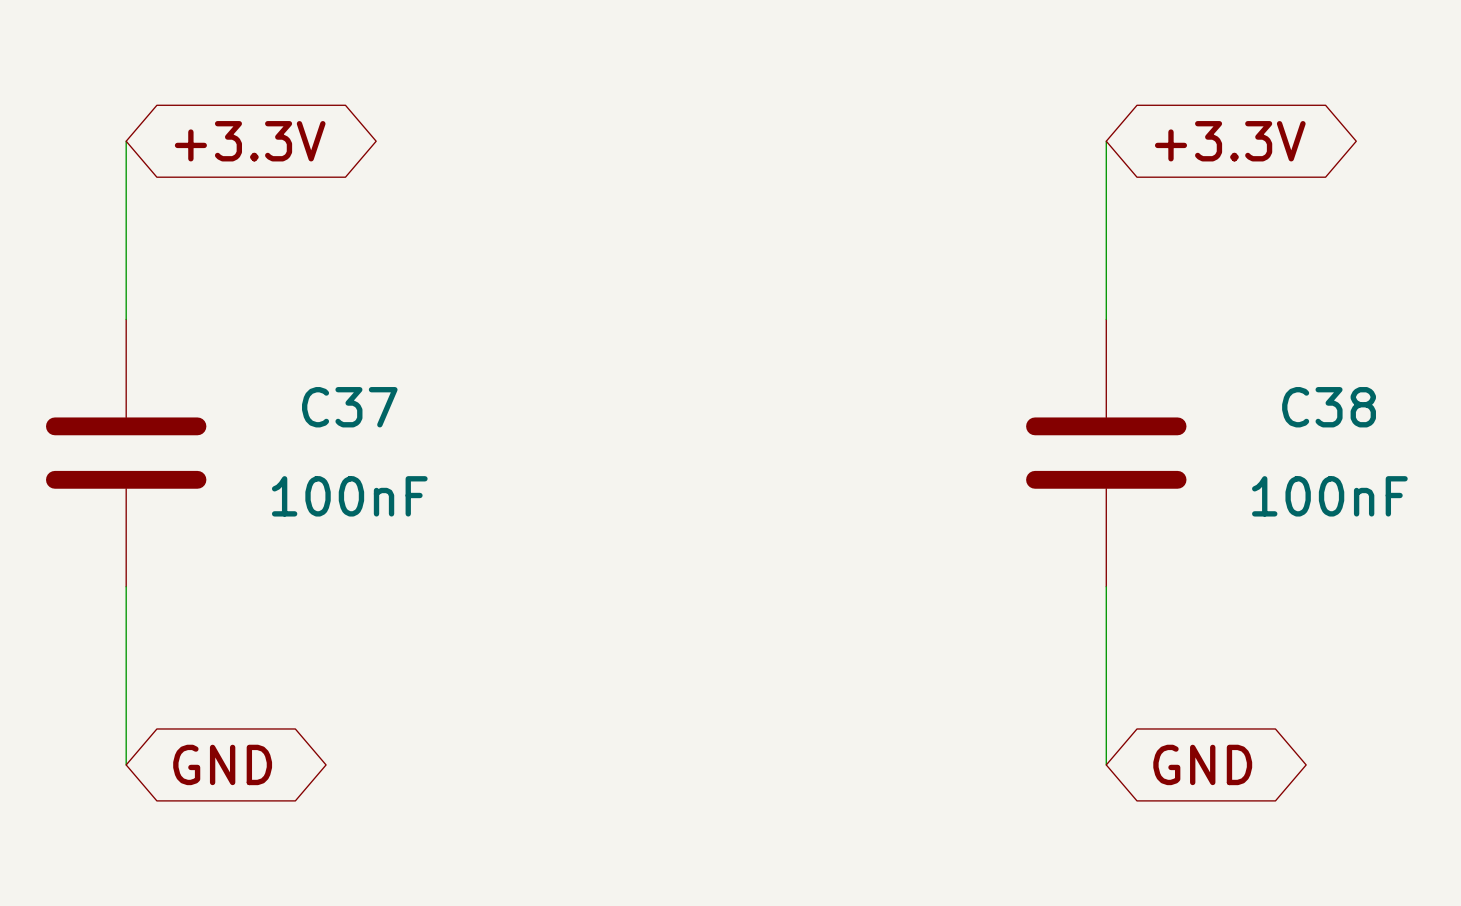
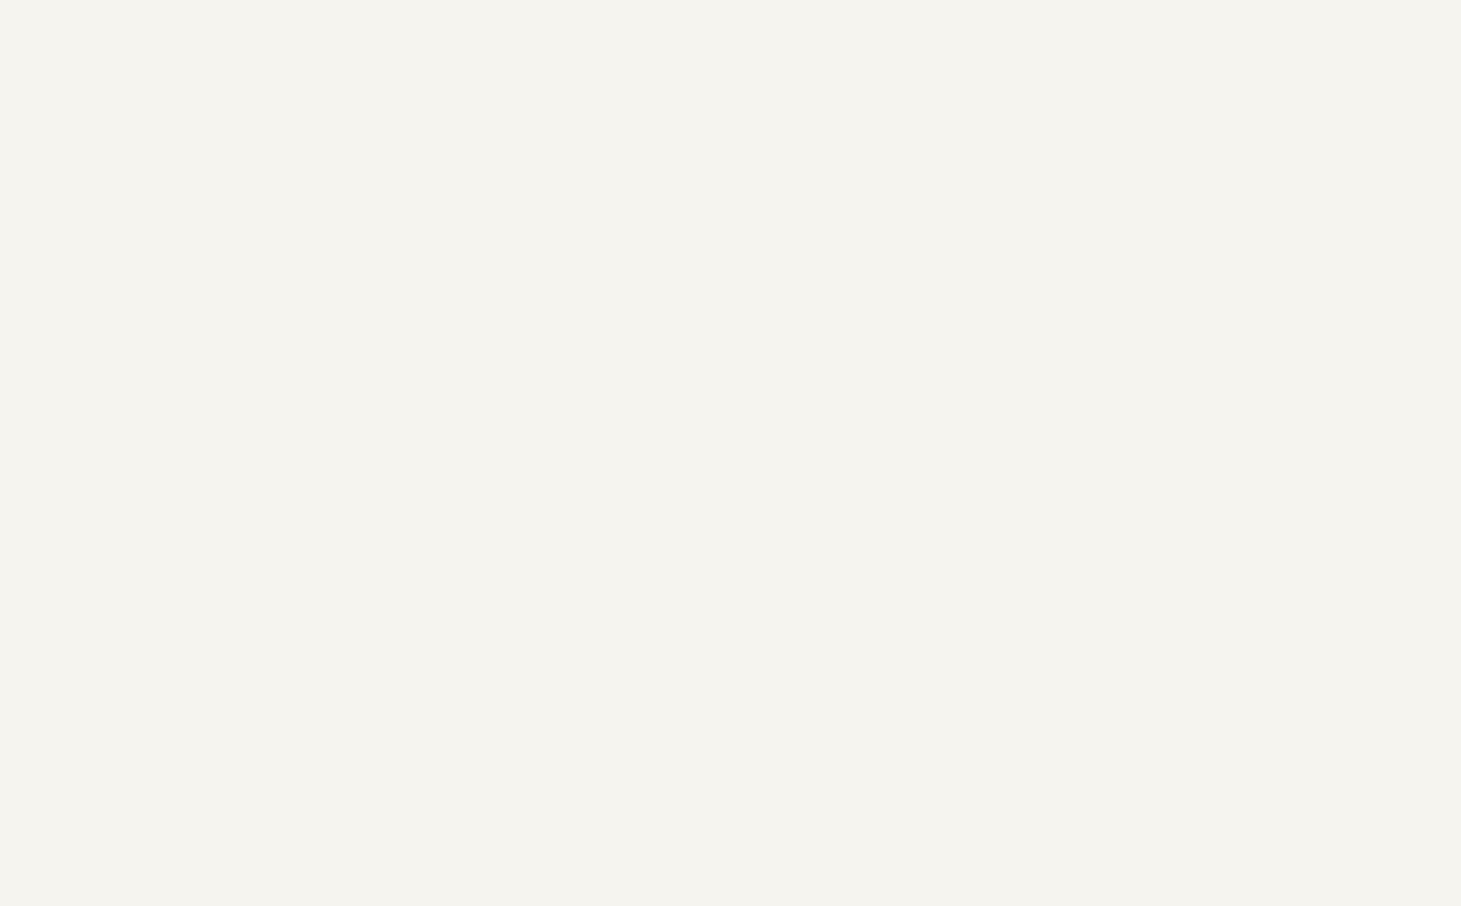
wire: (126, 141) (126, 319) -> none
global label: +3.3V (250, 141) -> none
wire: (1106, 141) (1106, 319) -> none
global label: +3.3V (1230, 141) -> none
C37: 100nF (126, 453) -> none
C38: 100nF (1106, 453) -> none
wire: (126, 586) (126, 764) -> none
wire: (1106, 586) (1106, 764) -> none
global label: GND (222, 764) -> none
global label: GND (1202, 764) -> none

